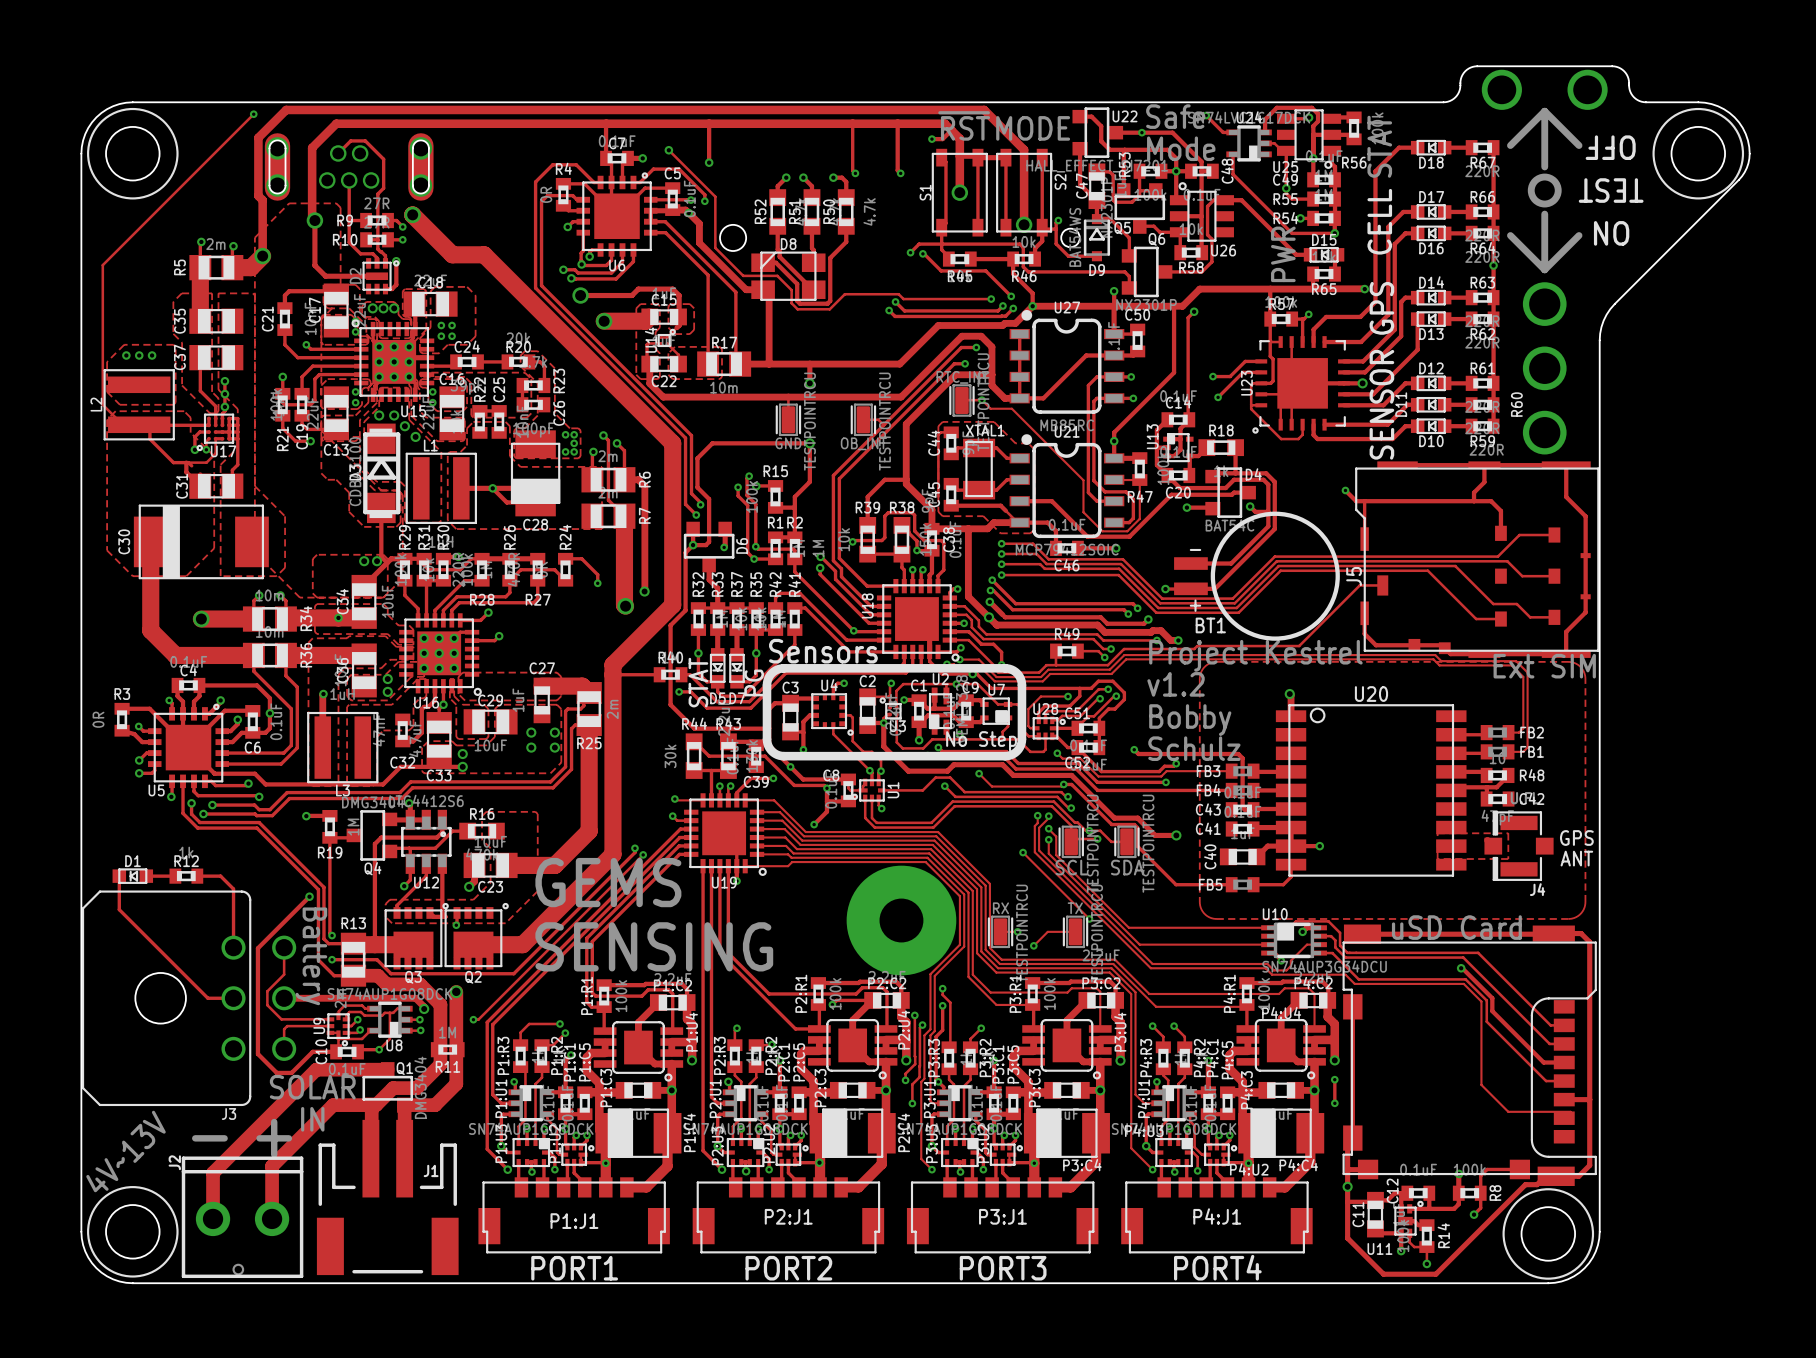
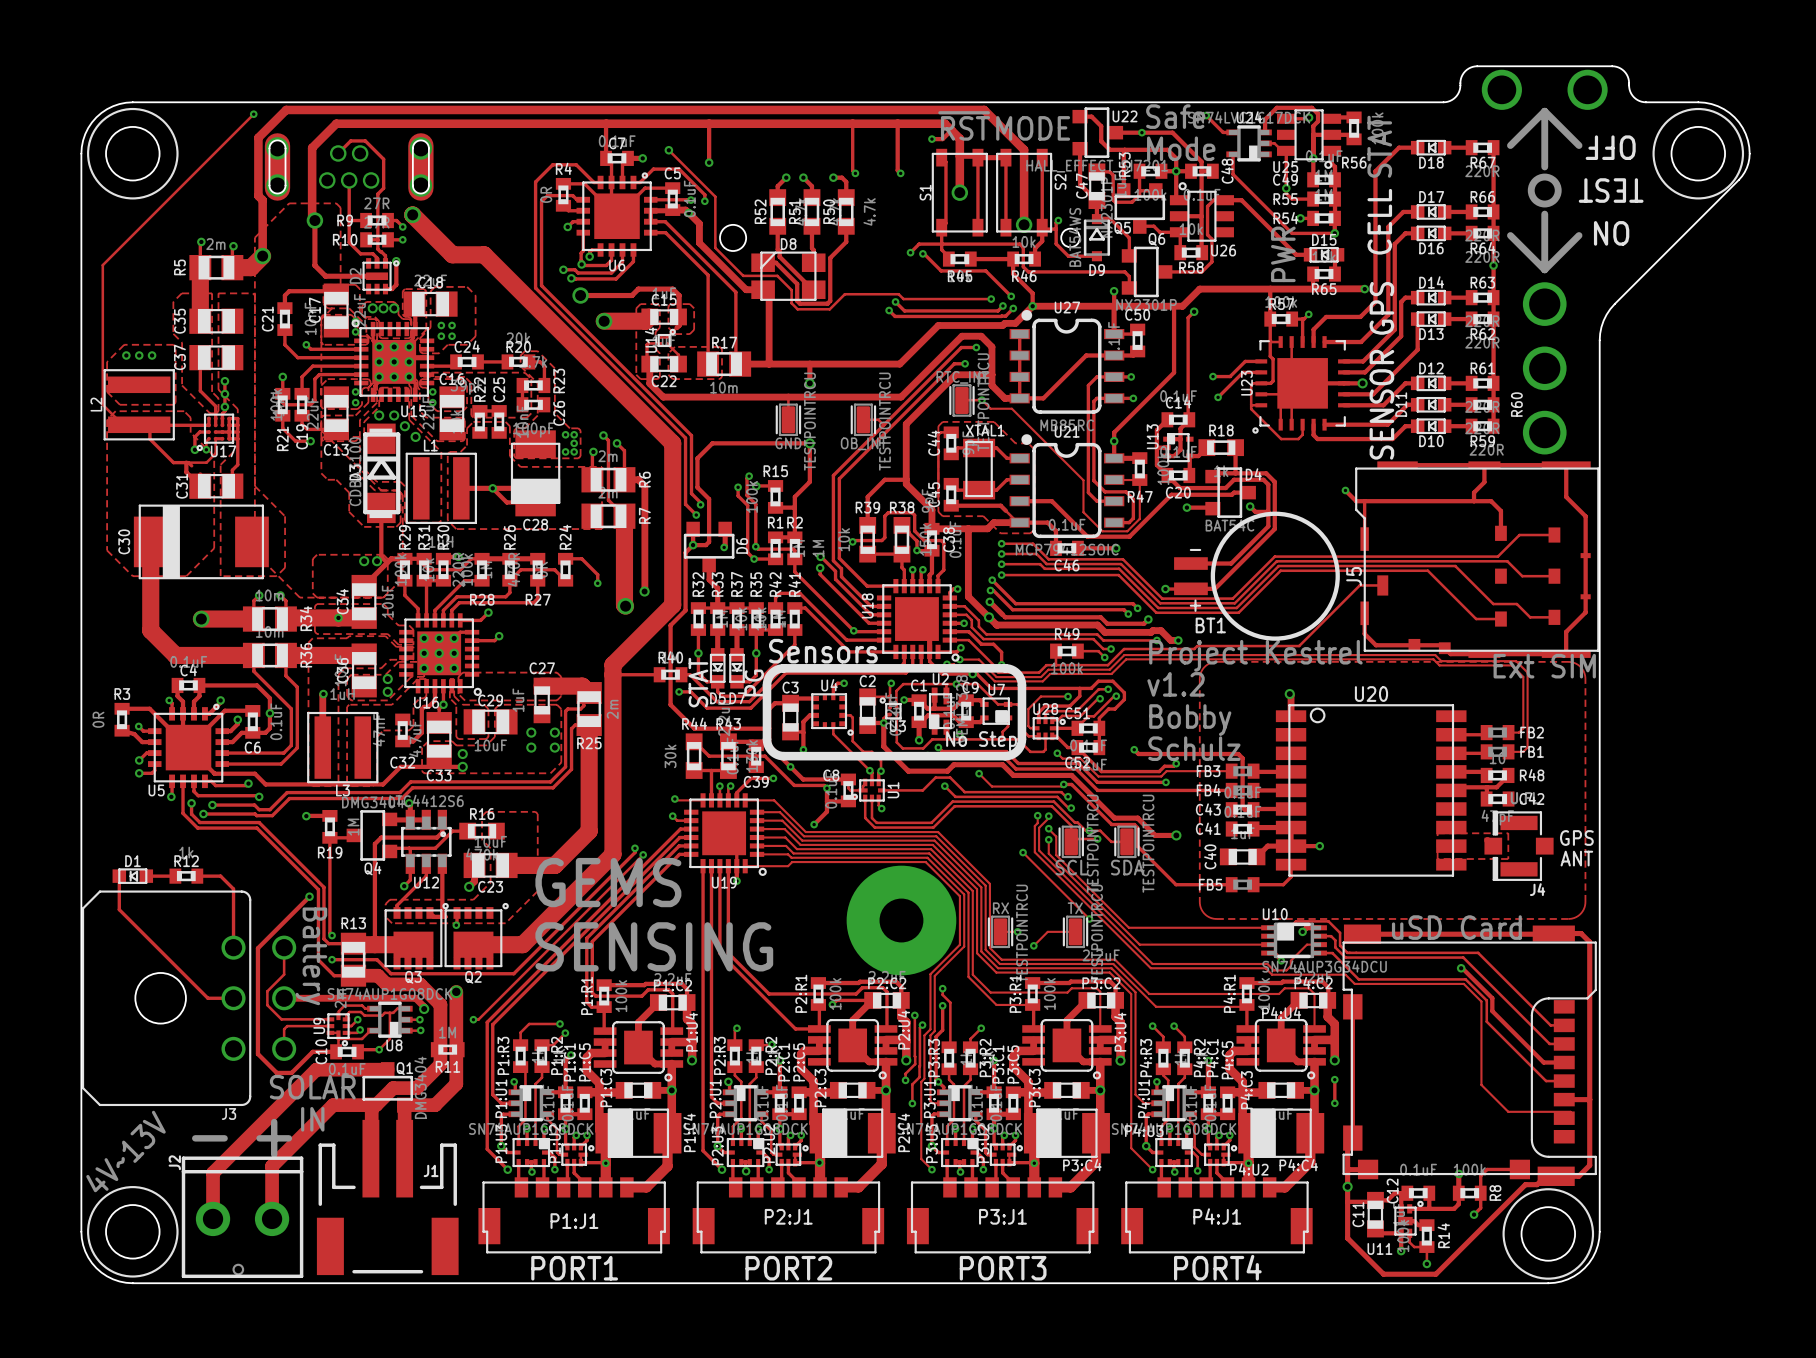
R49 value: none -> 100k (1066, 668)

